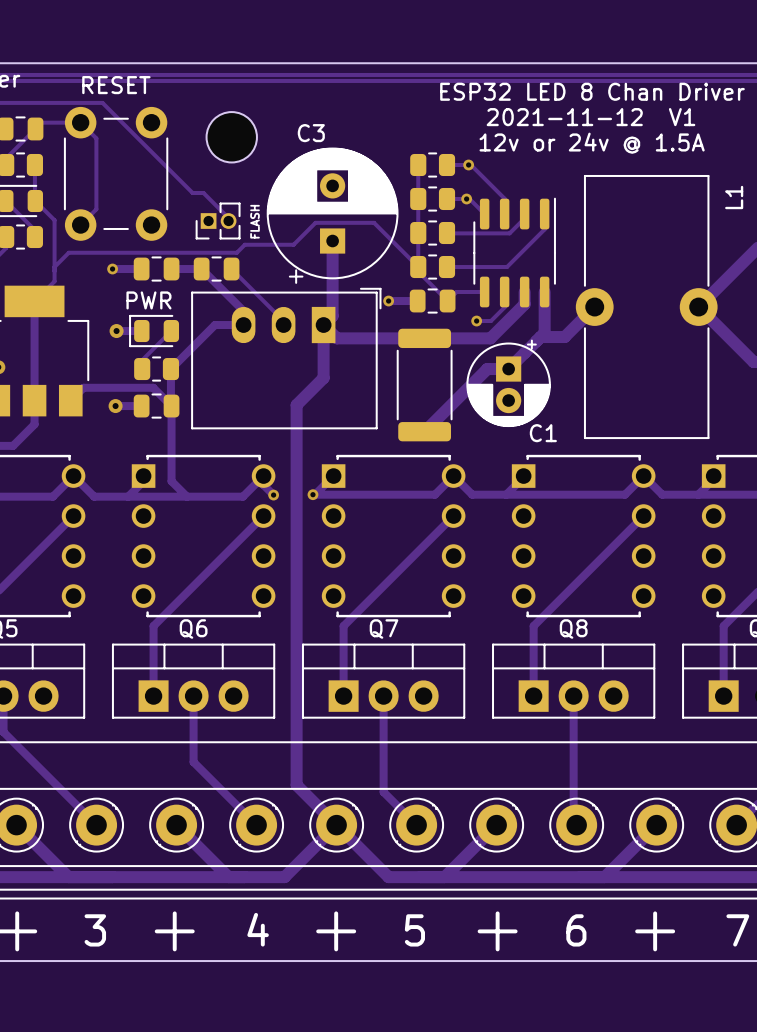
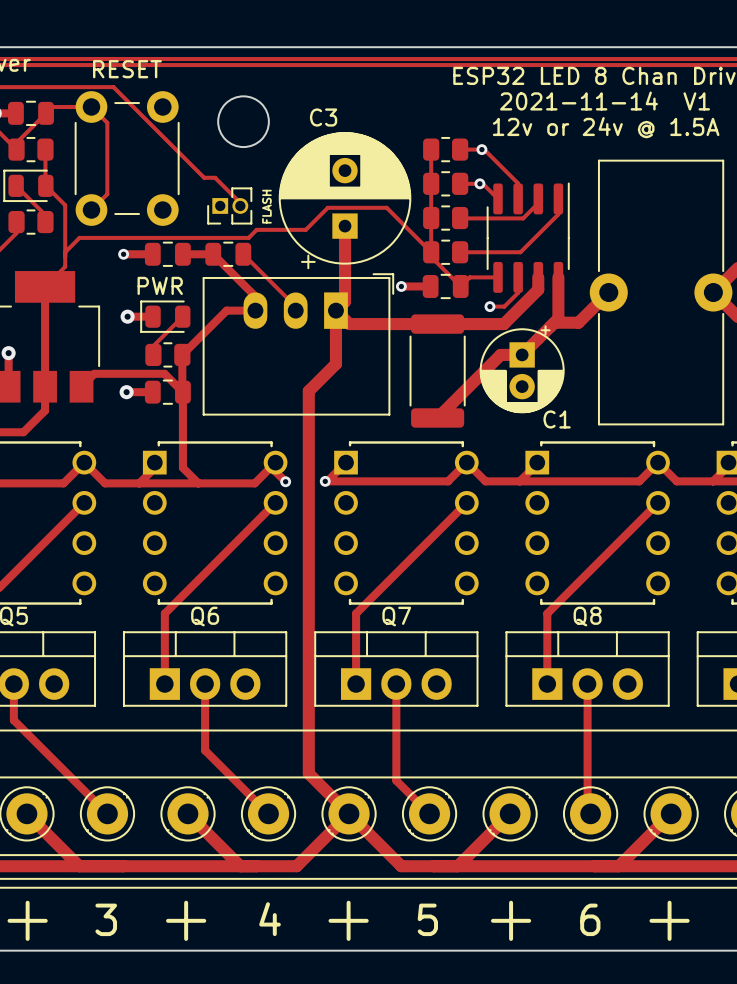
text: 2021-11-12 V1 (590, 117) -> 2021-11-14 V1 (605, 101)

